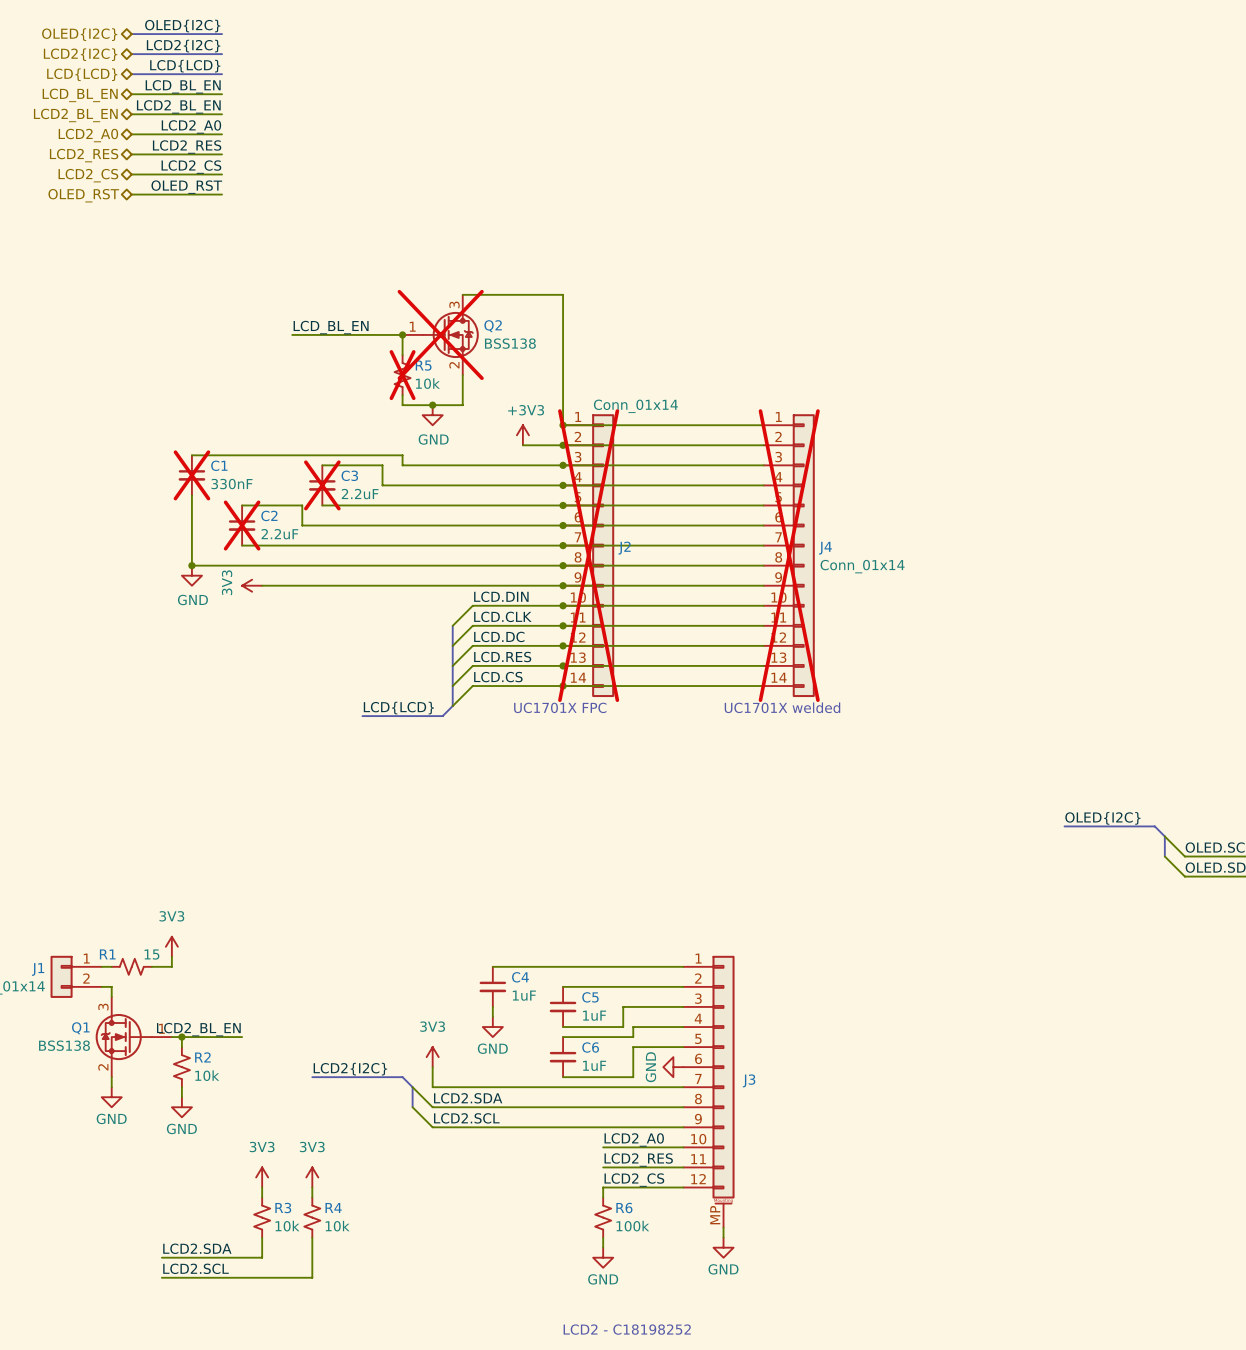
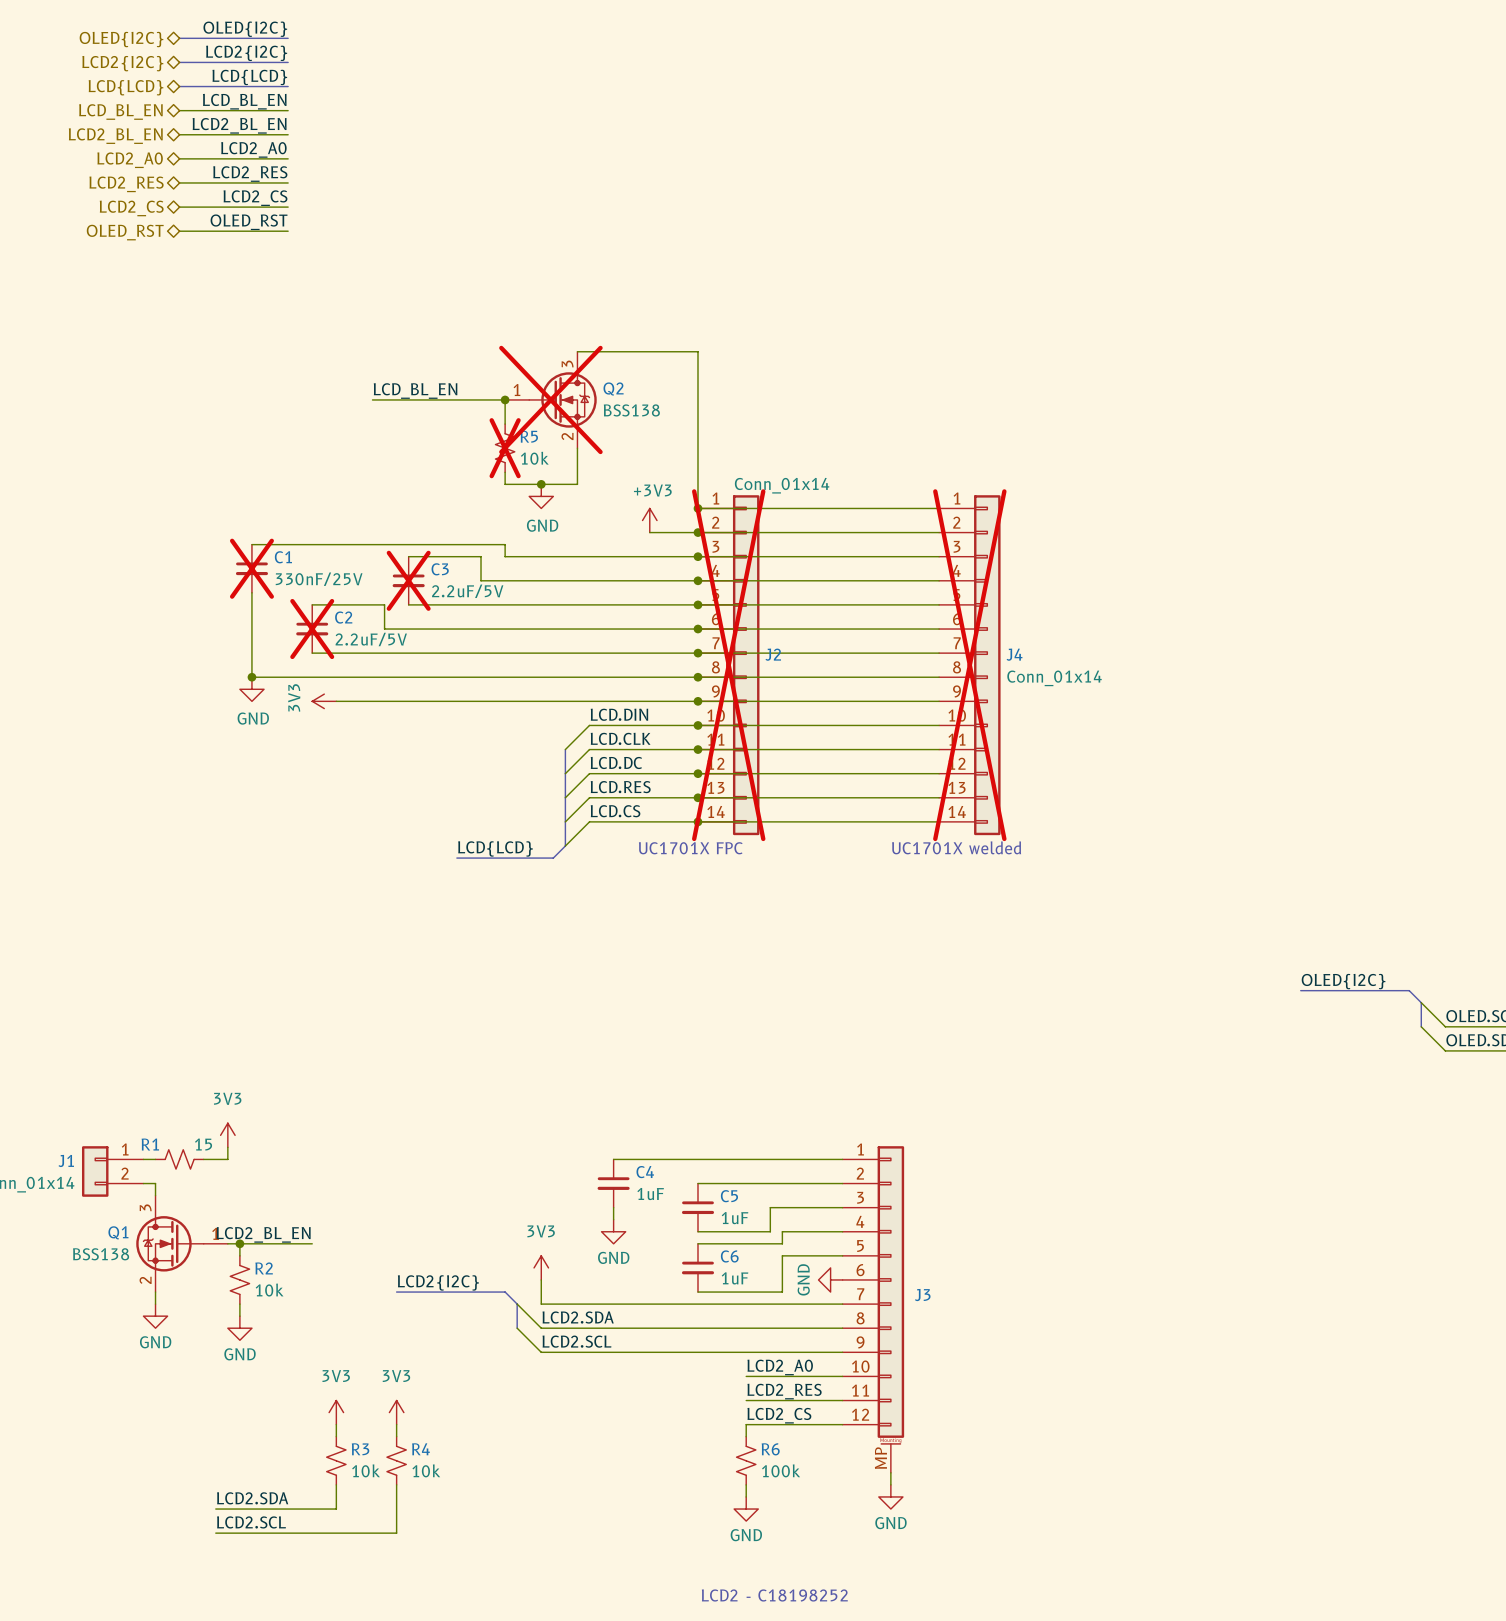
C1 value: 330nF (231, 484) -> 330nF/25V (319, 579)
C3 value: 2.2uF (360, 494) -> 2.2uF/5V (467, 591)
C2 value: 2.2uF (279, 534) -> 2.2uF/5V (371, 639)

